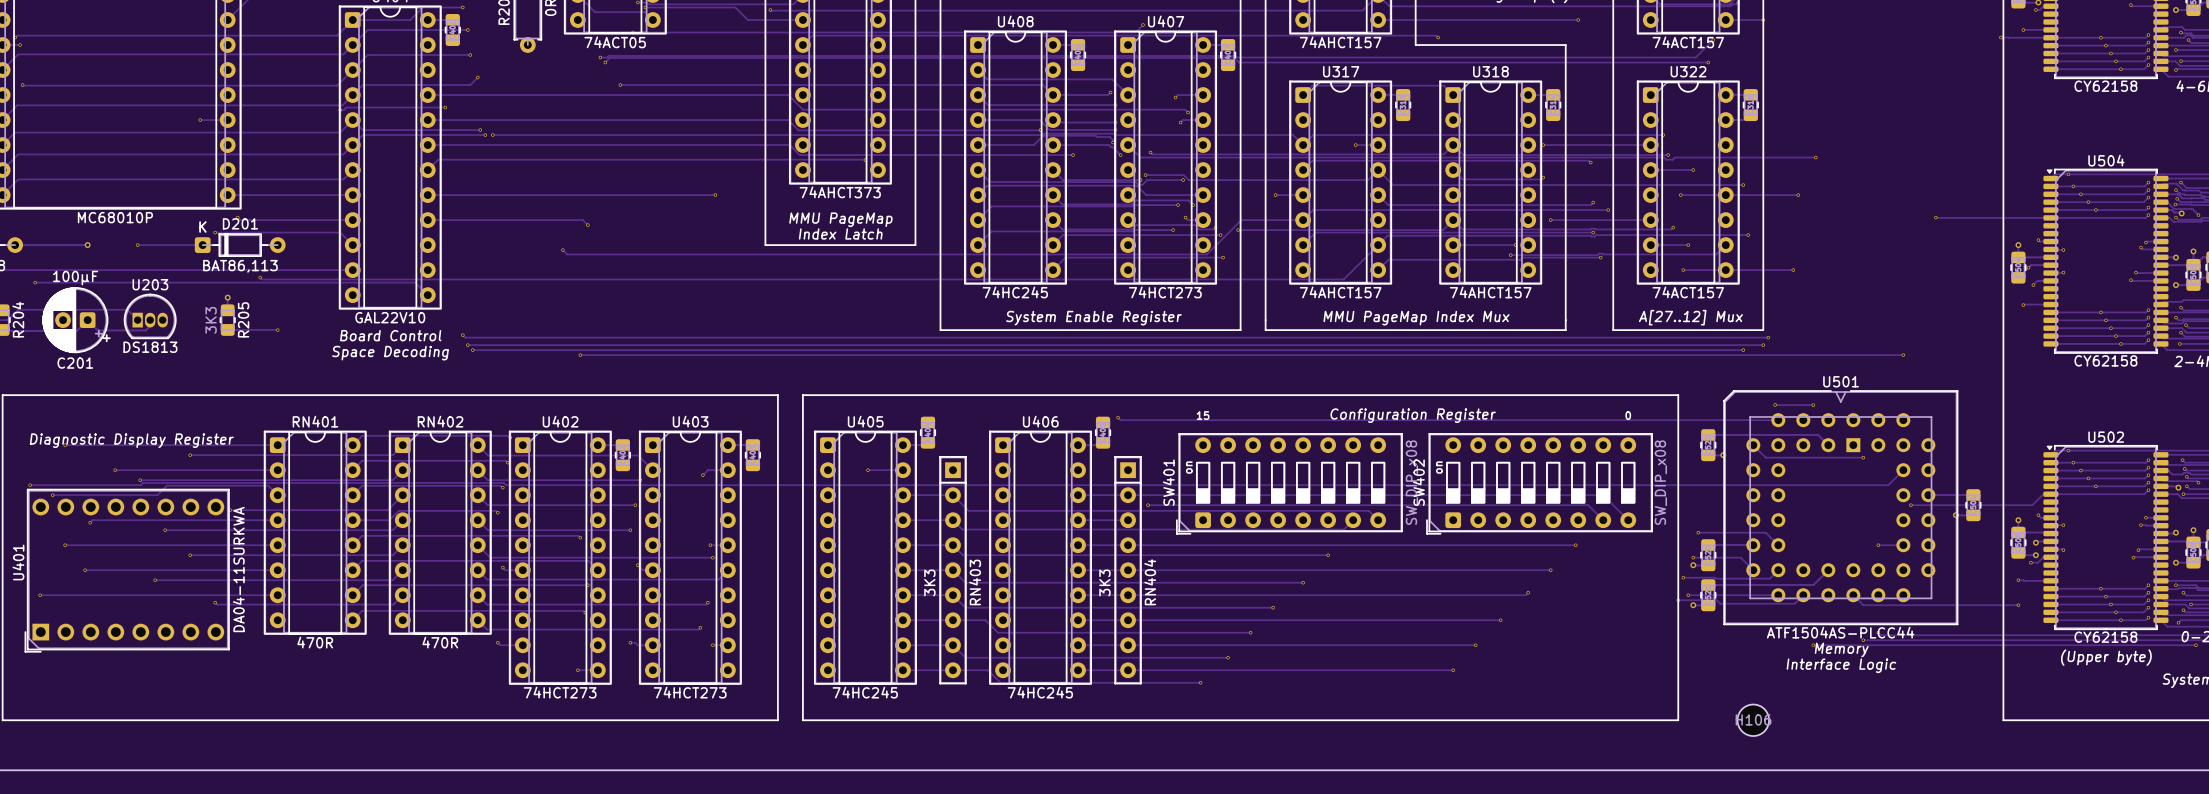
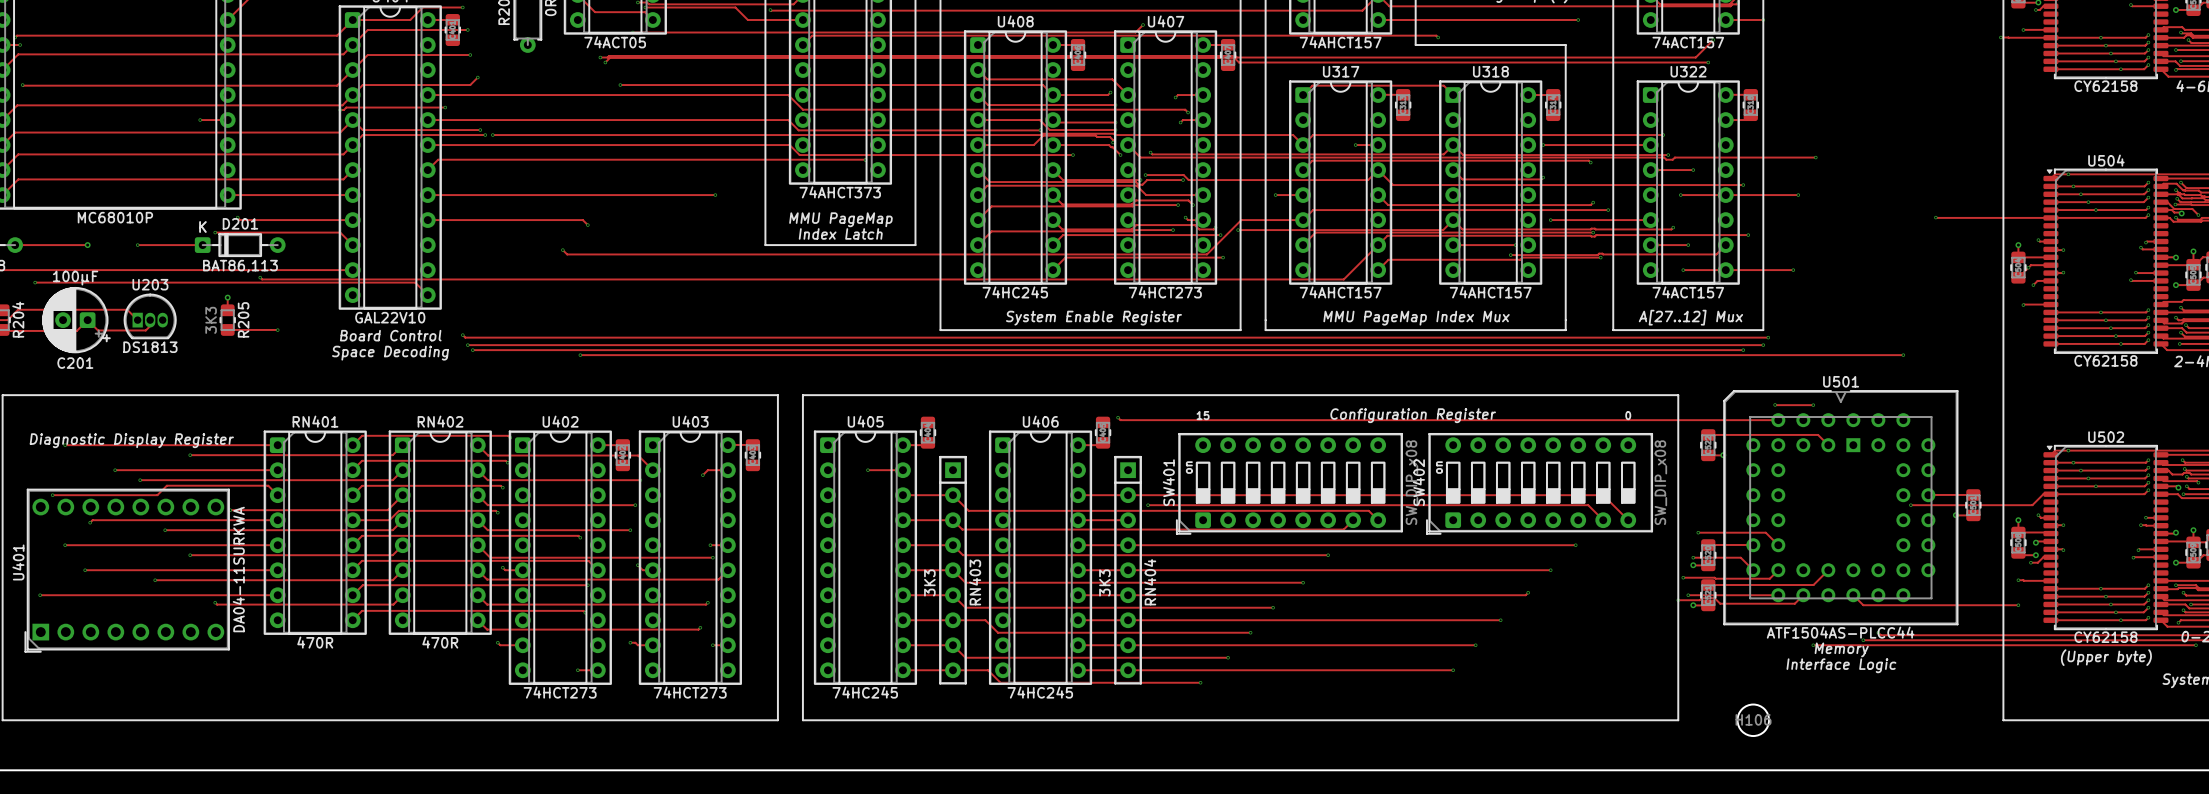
track: (1753, 445) (1765, 457) (1863, 457) -> none
via: (1863, 457) -> none
track: (1903, 470) (1888, 485) (505, 485) (503, 482) (142, 482) (140, 485) (30, 485) -> none
via: (30, 485) -> none
track: (1878, 545) (1903, 545) -> none
via: (1878, 545) -> none

